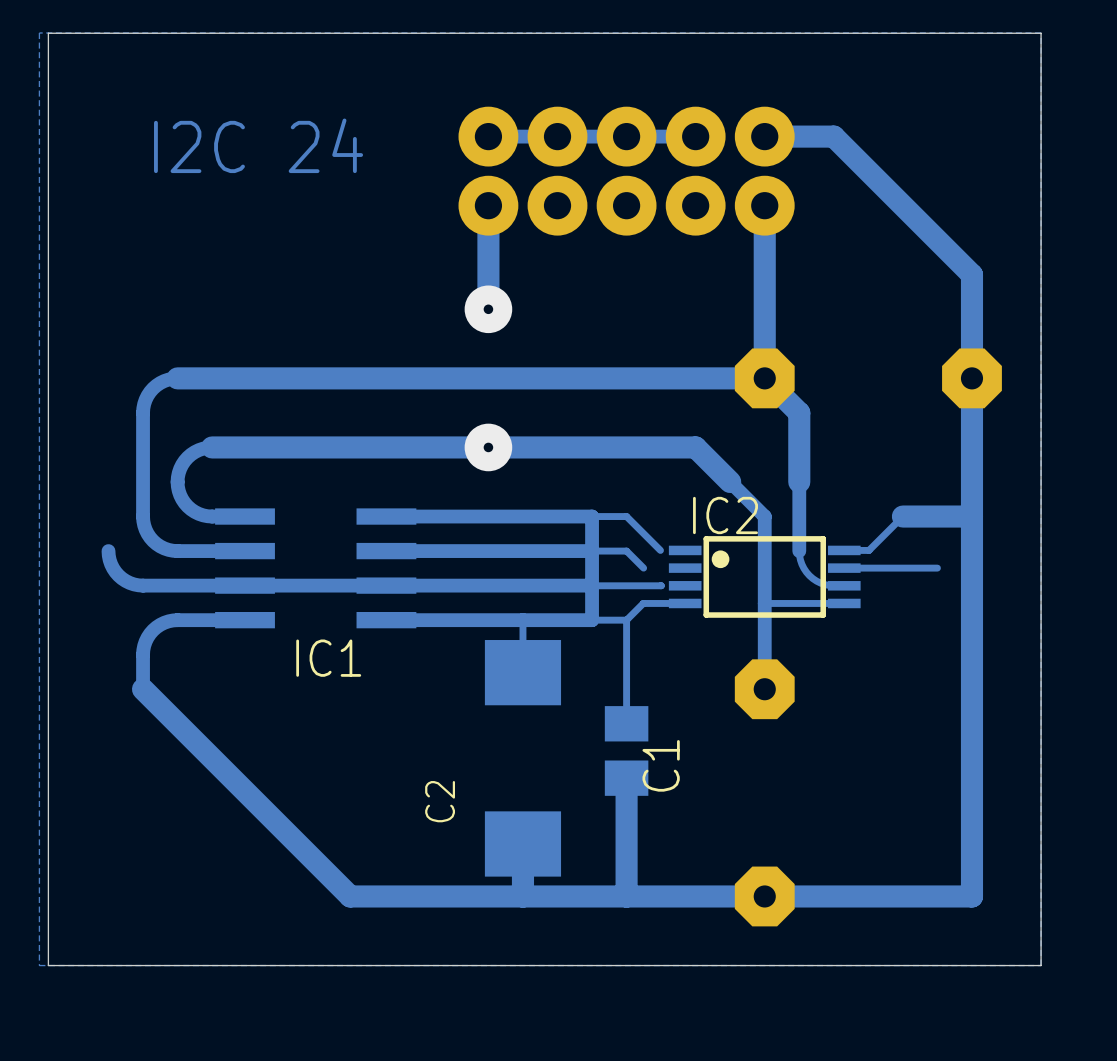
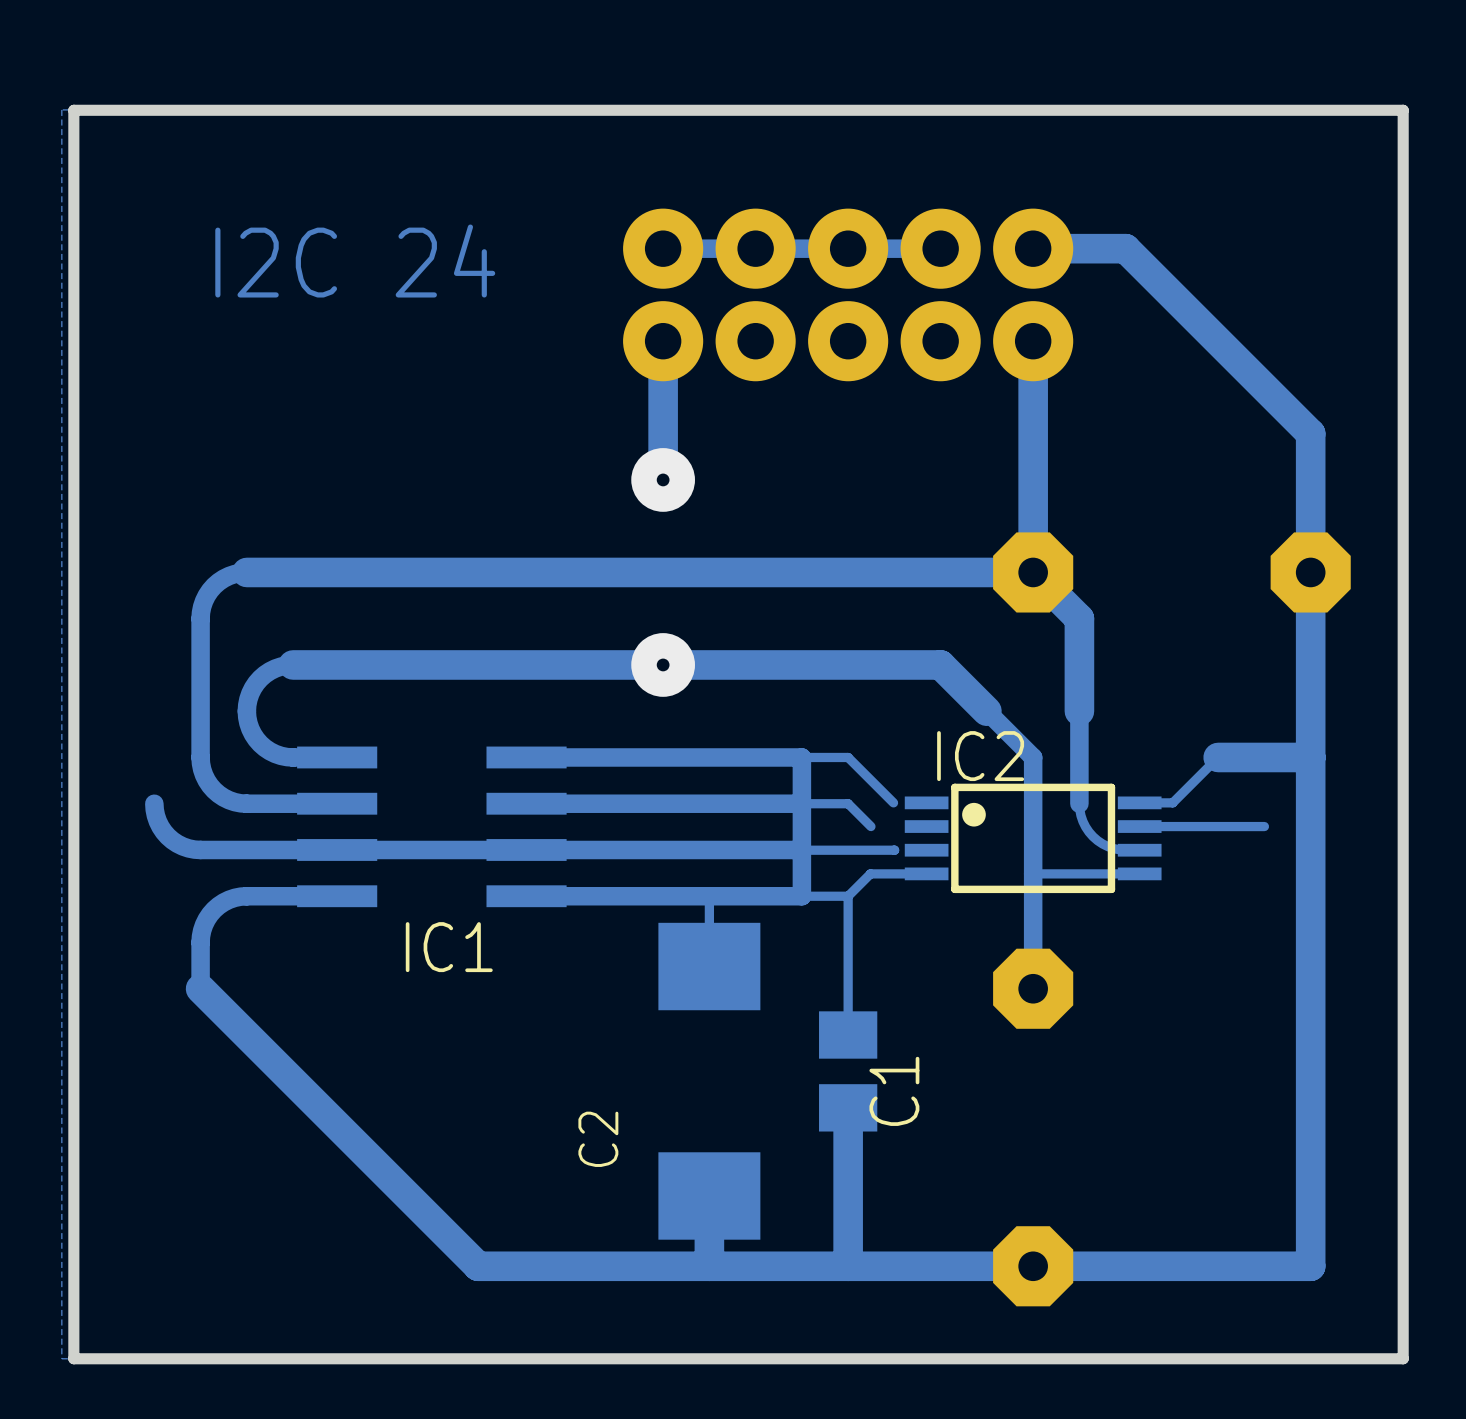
board edge width: thin (1041, 33) (48, 33) (48, 965) (1041, 965) (1041, 33) -> thick (1403, 110) (73, 110) (73, 1358) (1403, 1358) (1403, 110)

